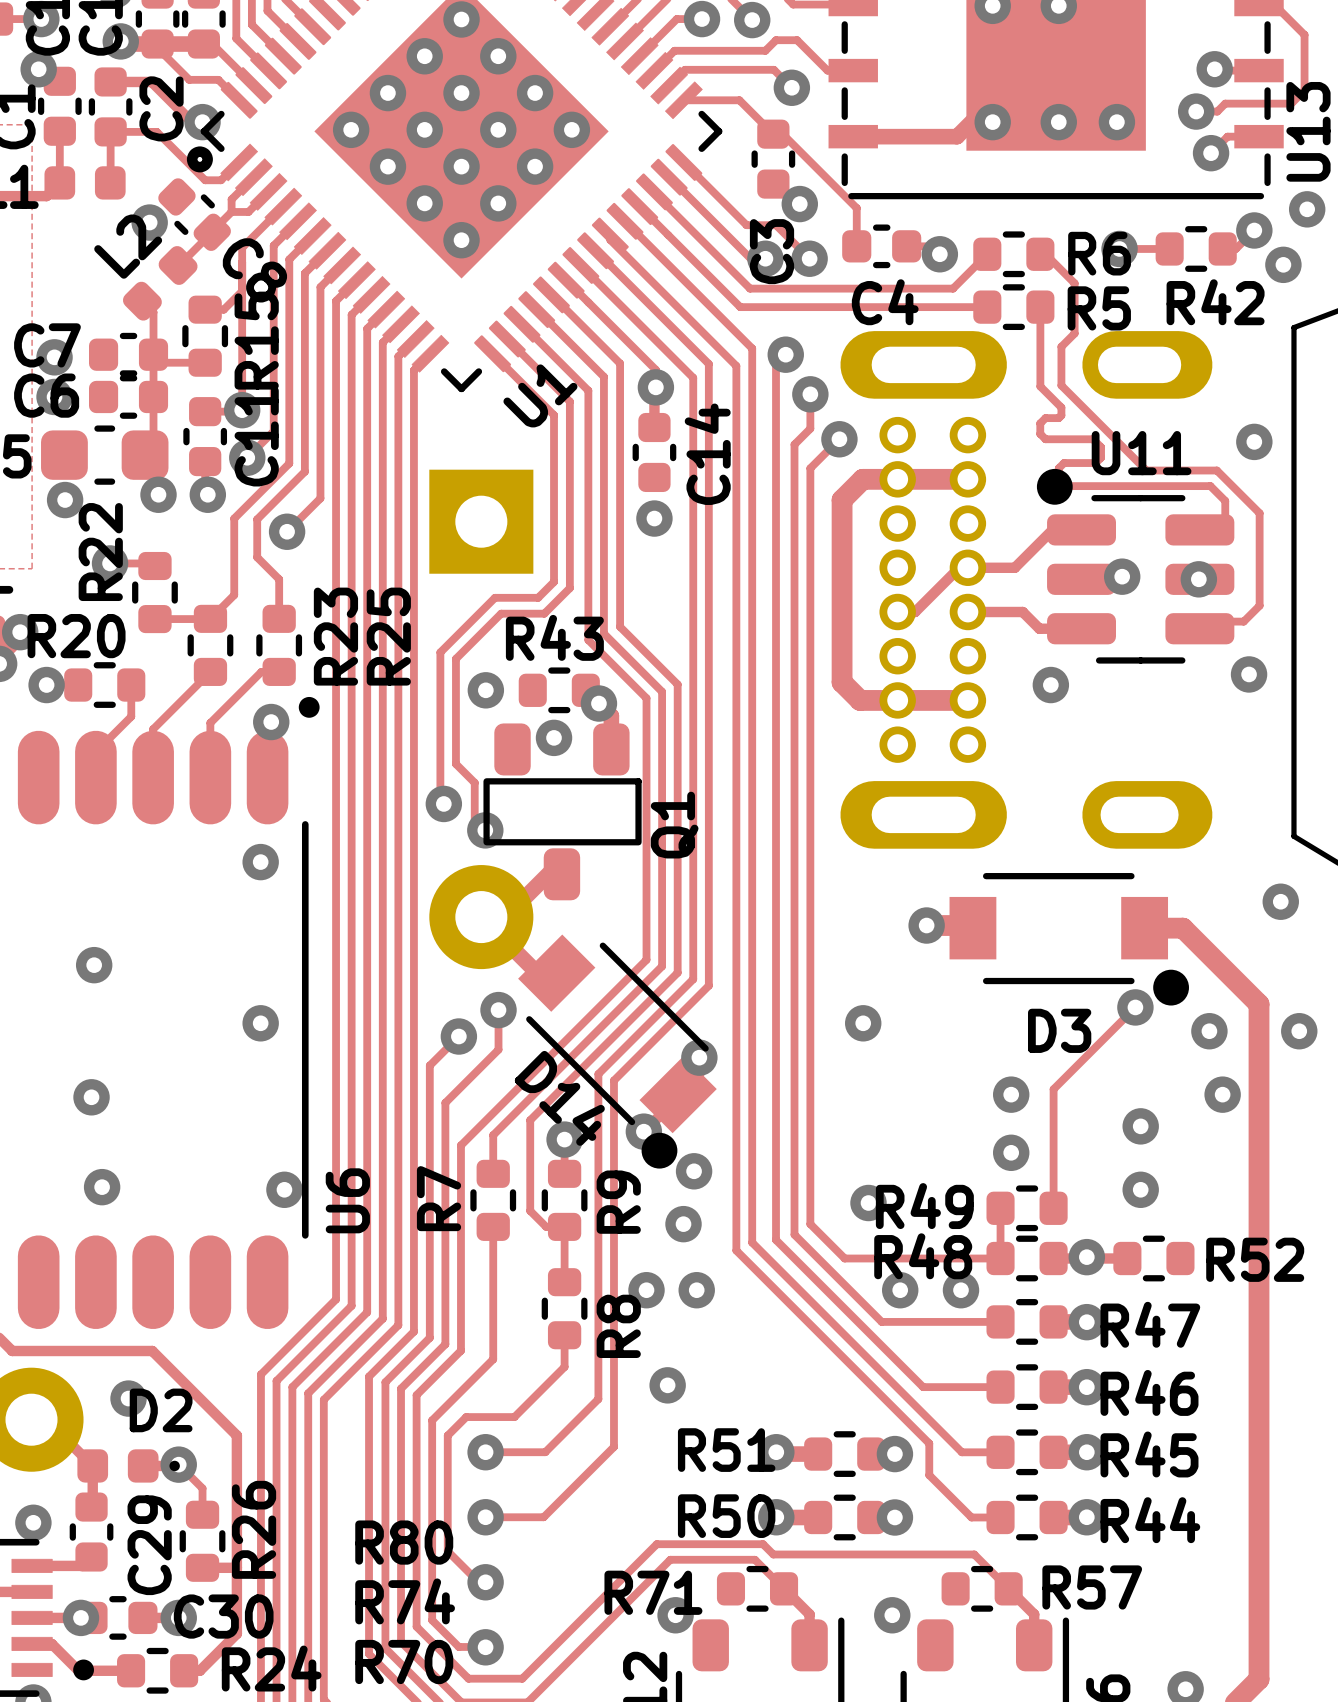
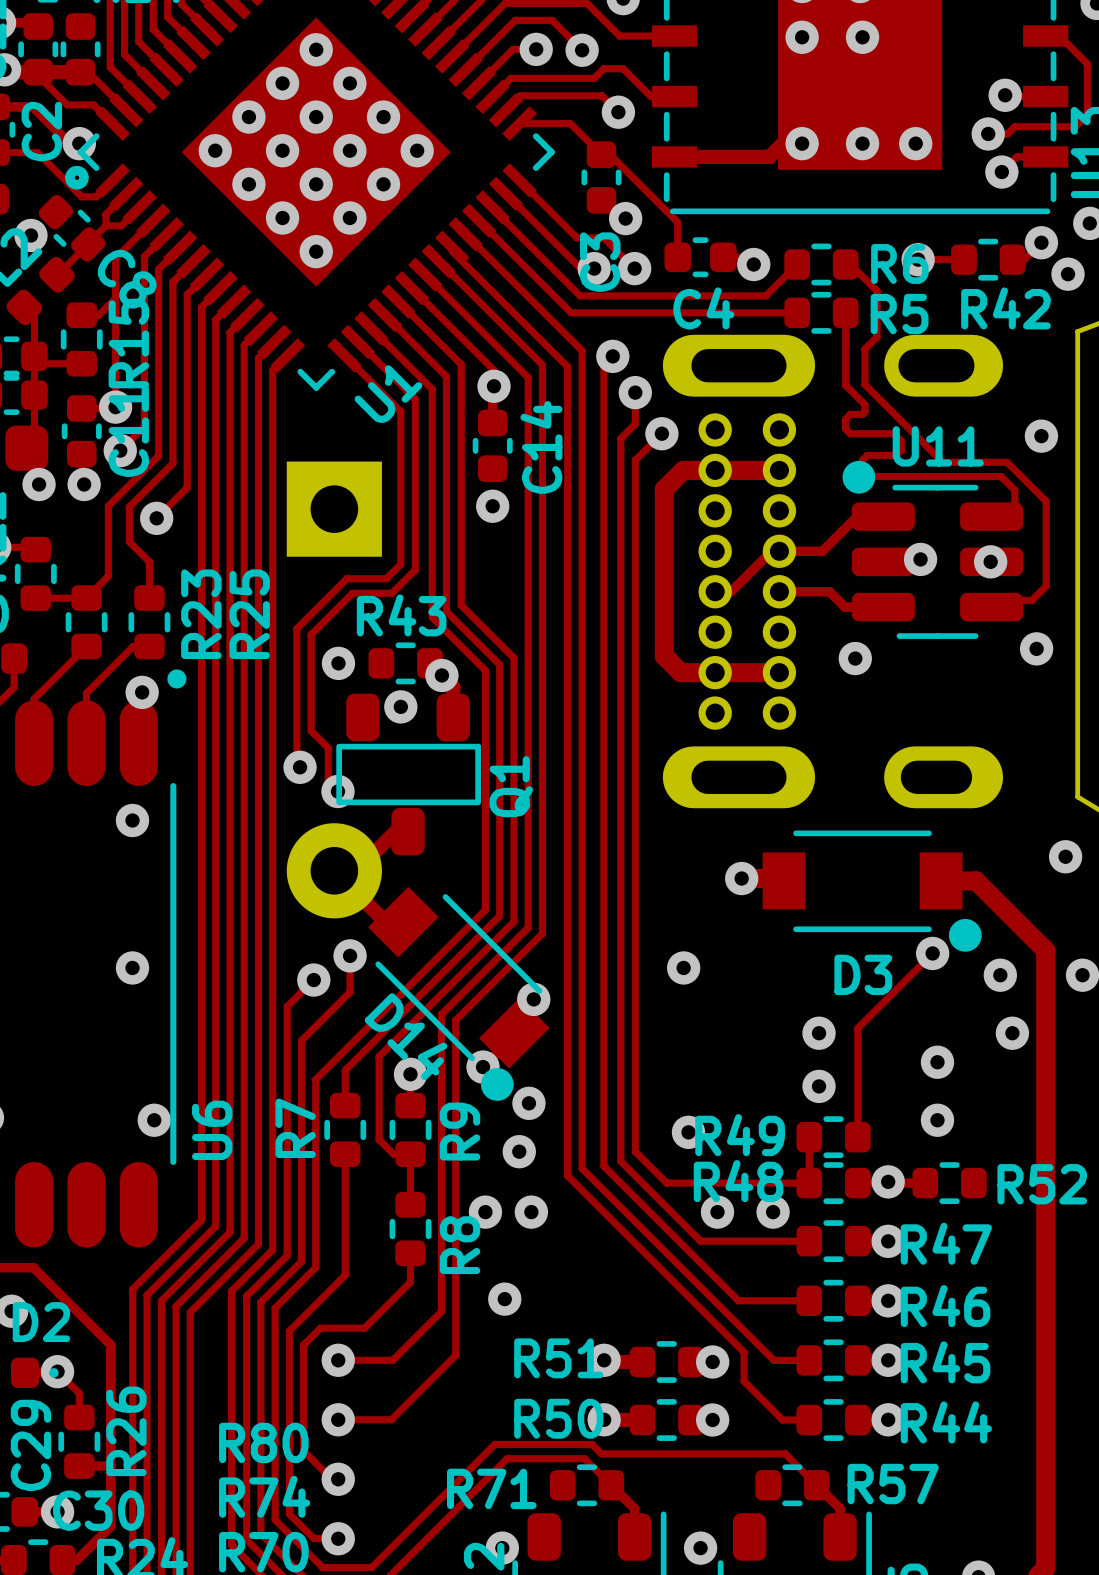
via position: (675, 1615) -> (502, 1548)
via position: (892, 1615) -> (700, 1548)

